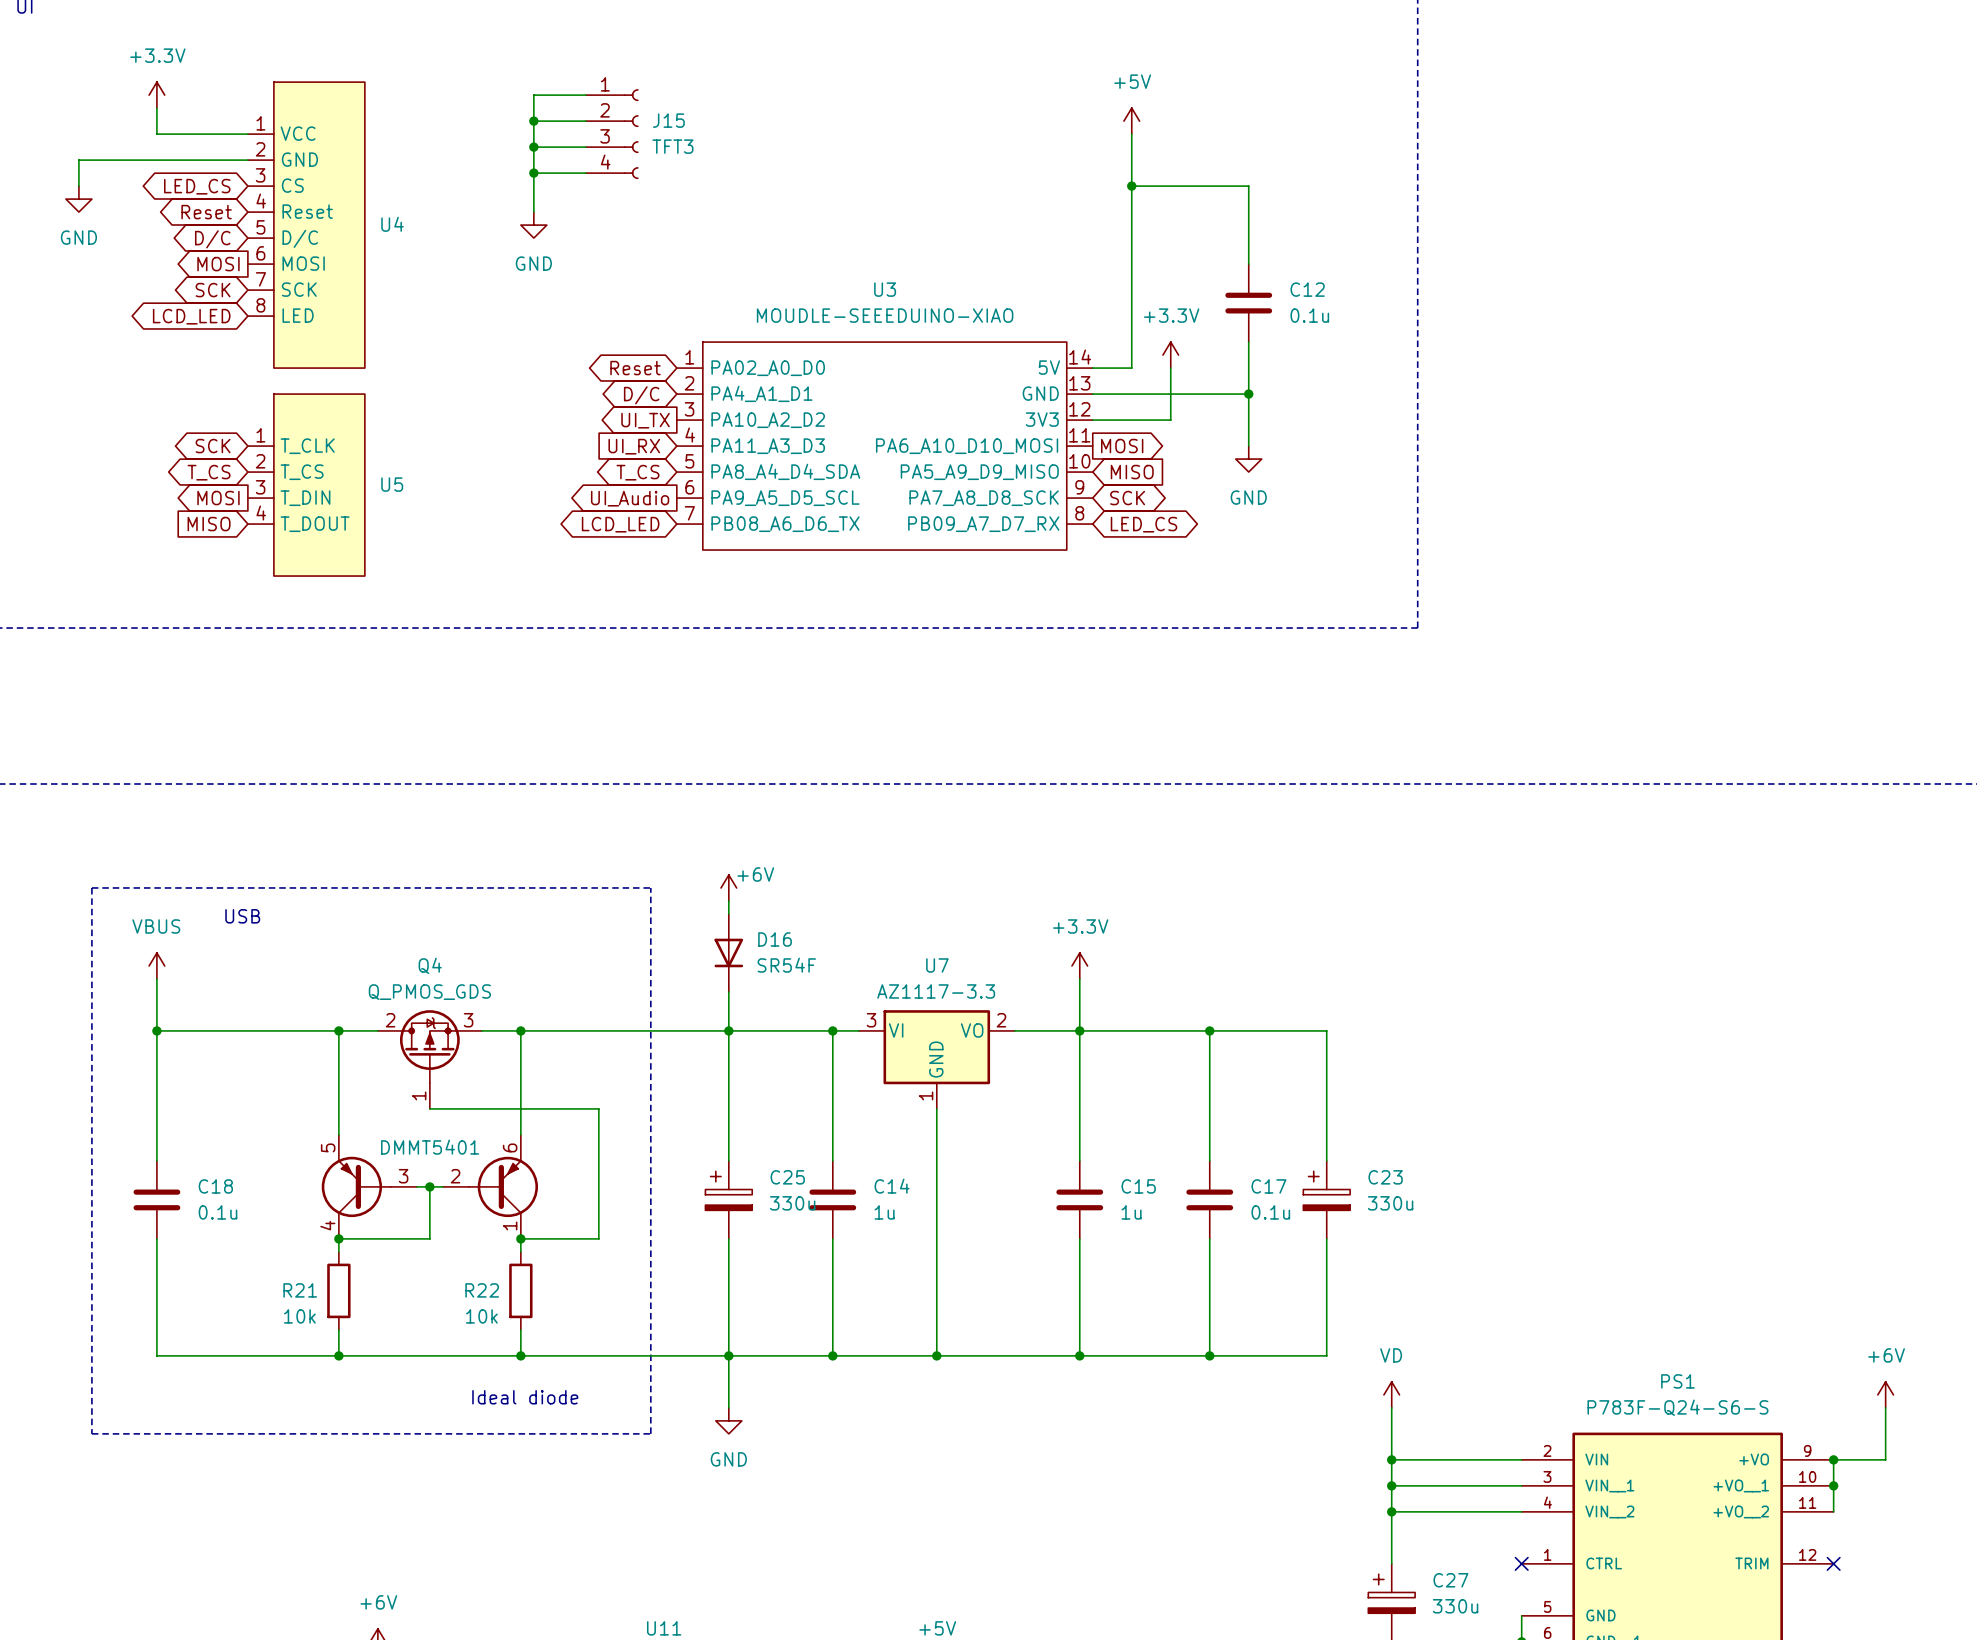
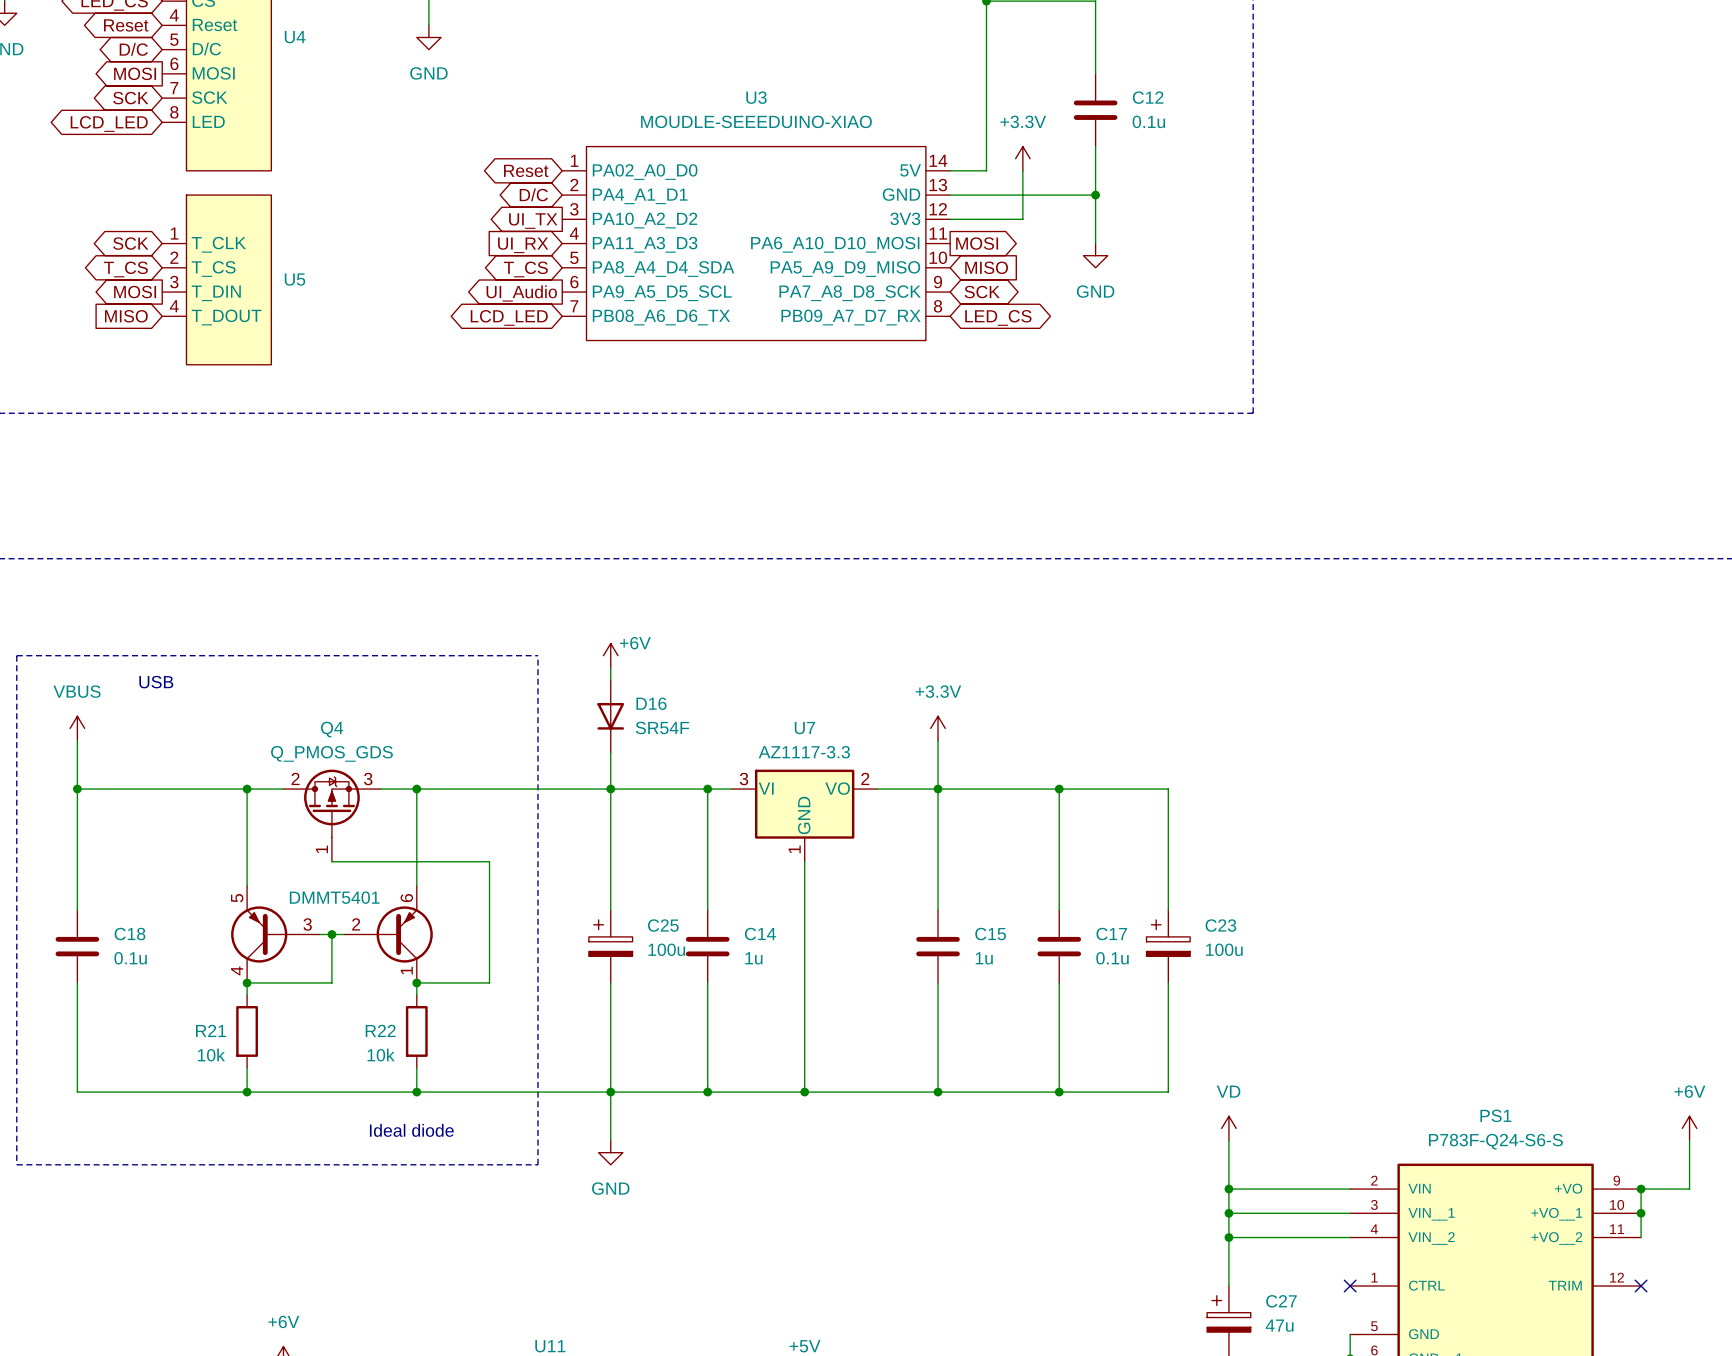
C25 value: 330u (792, 1203) -> 100u (666, 949)
C23 value: 330u (1390, 1203) -> 100u (1224, 949)
C27 value: 330u (1455, 1606) -> 47u (1279, 1325)

